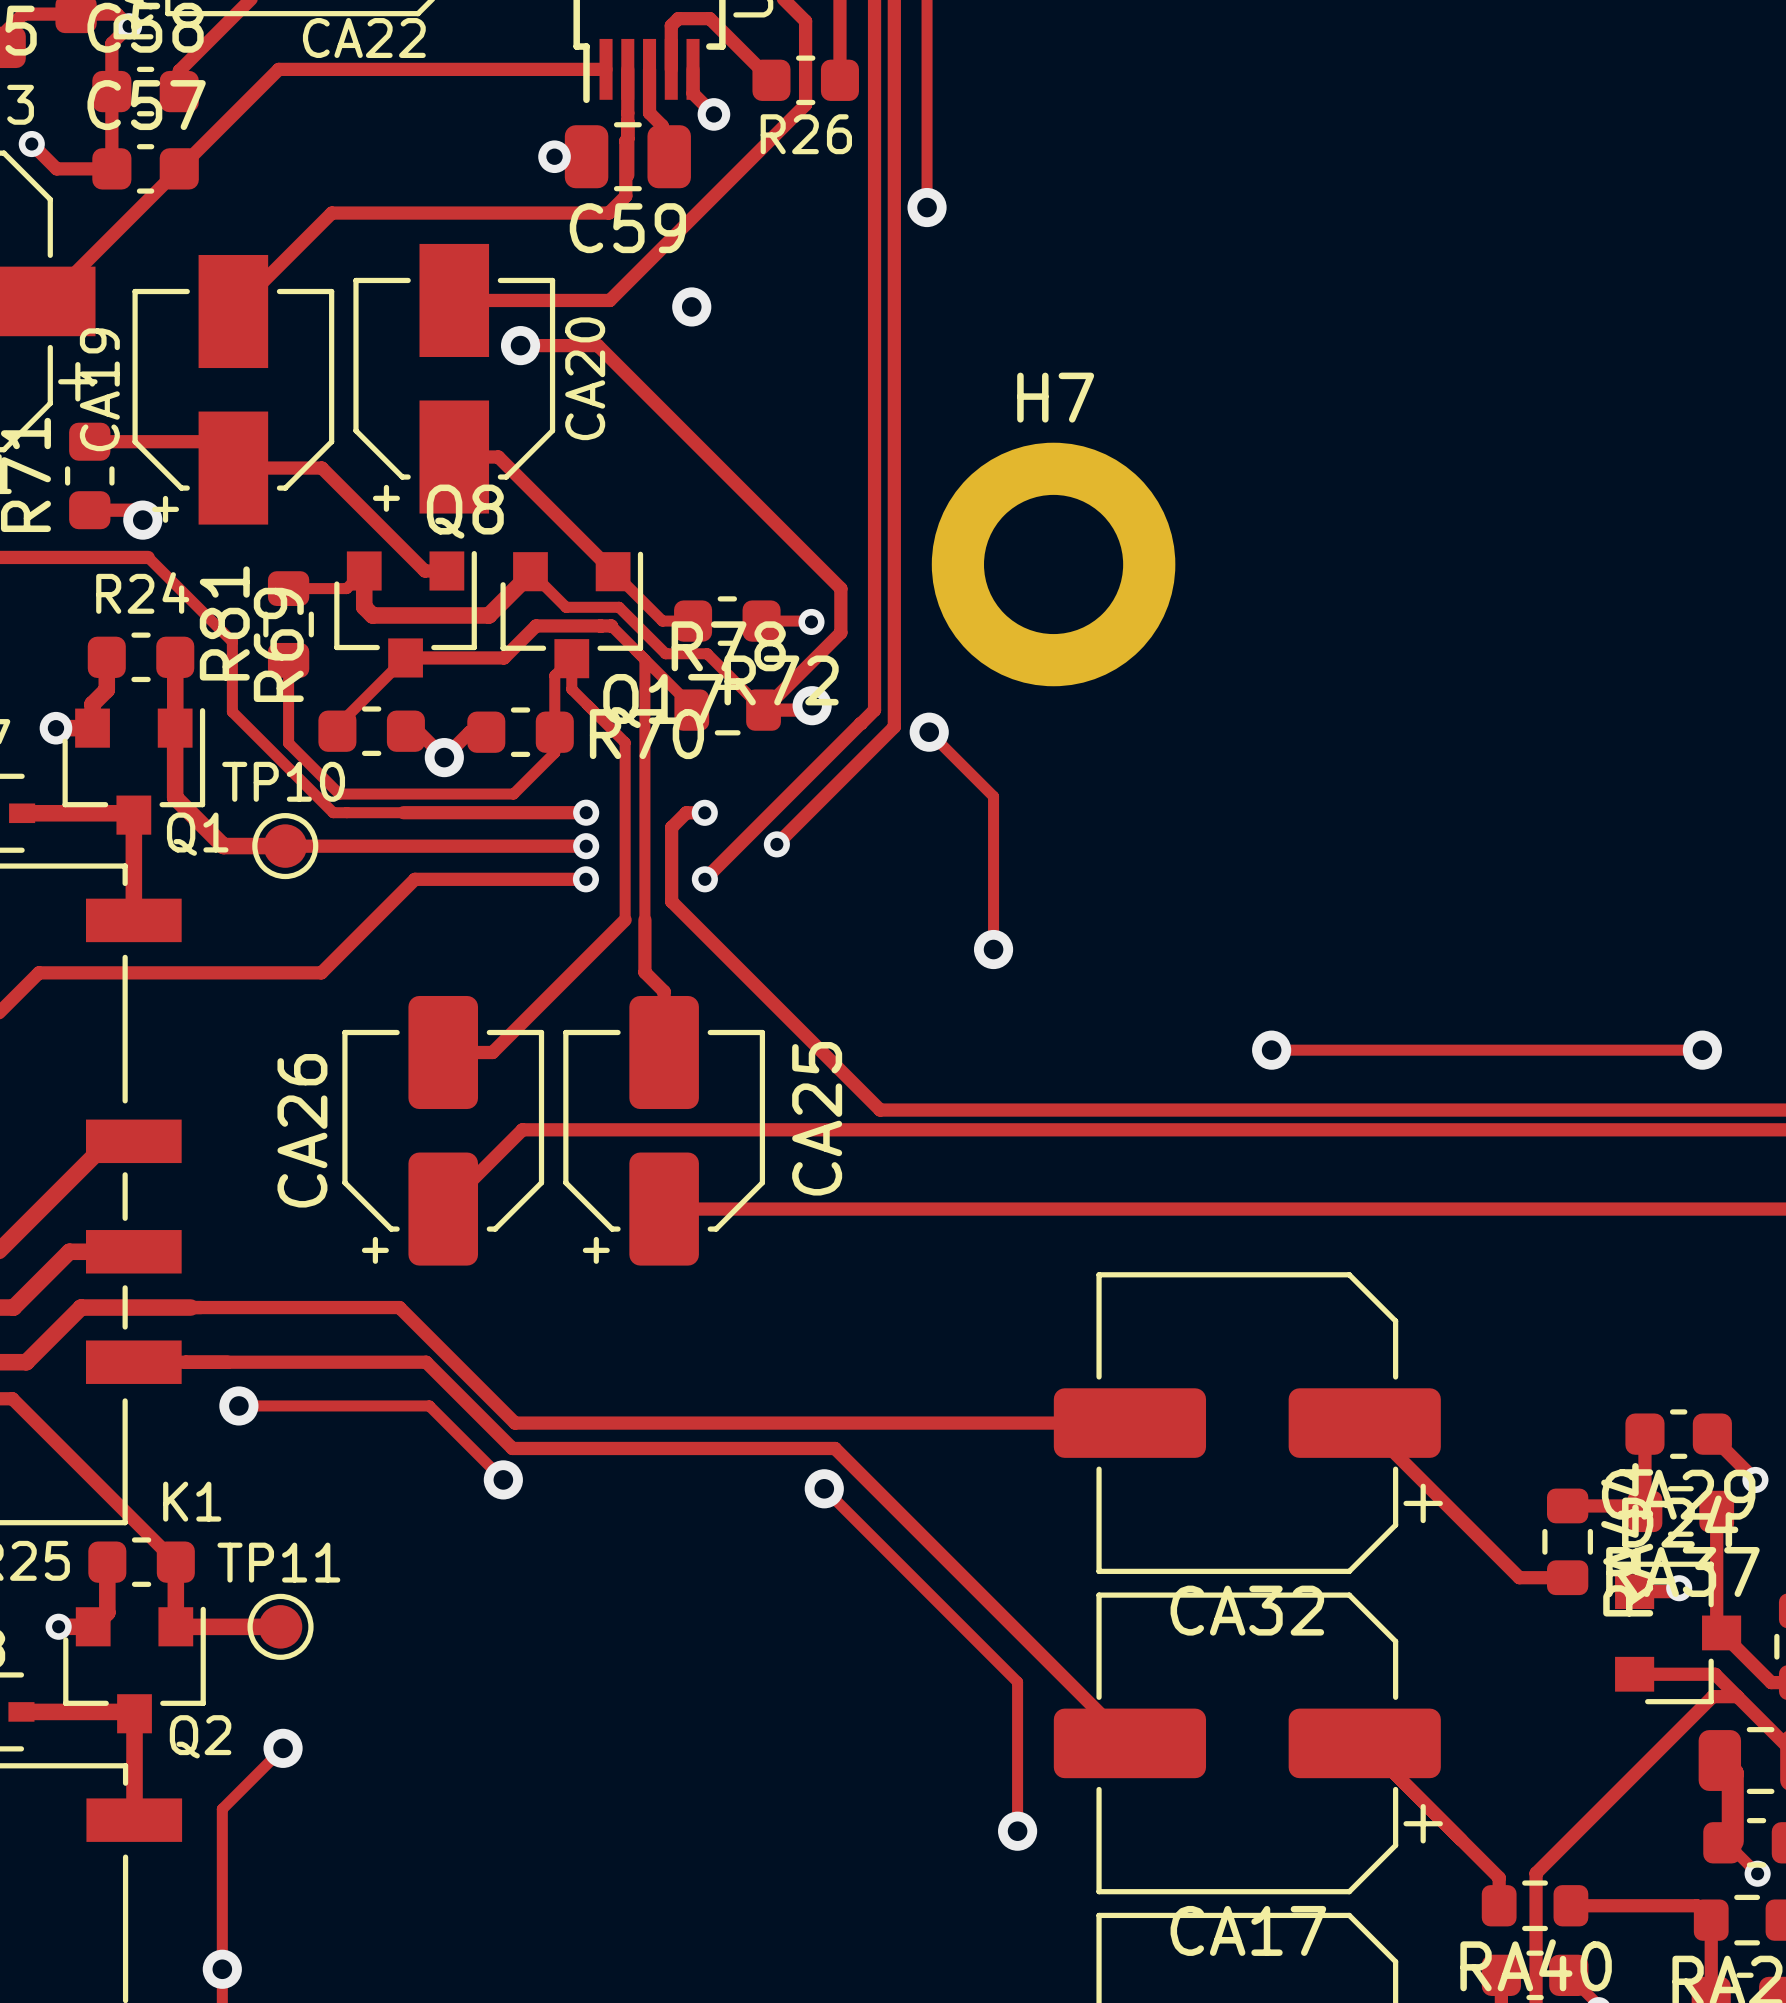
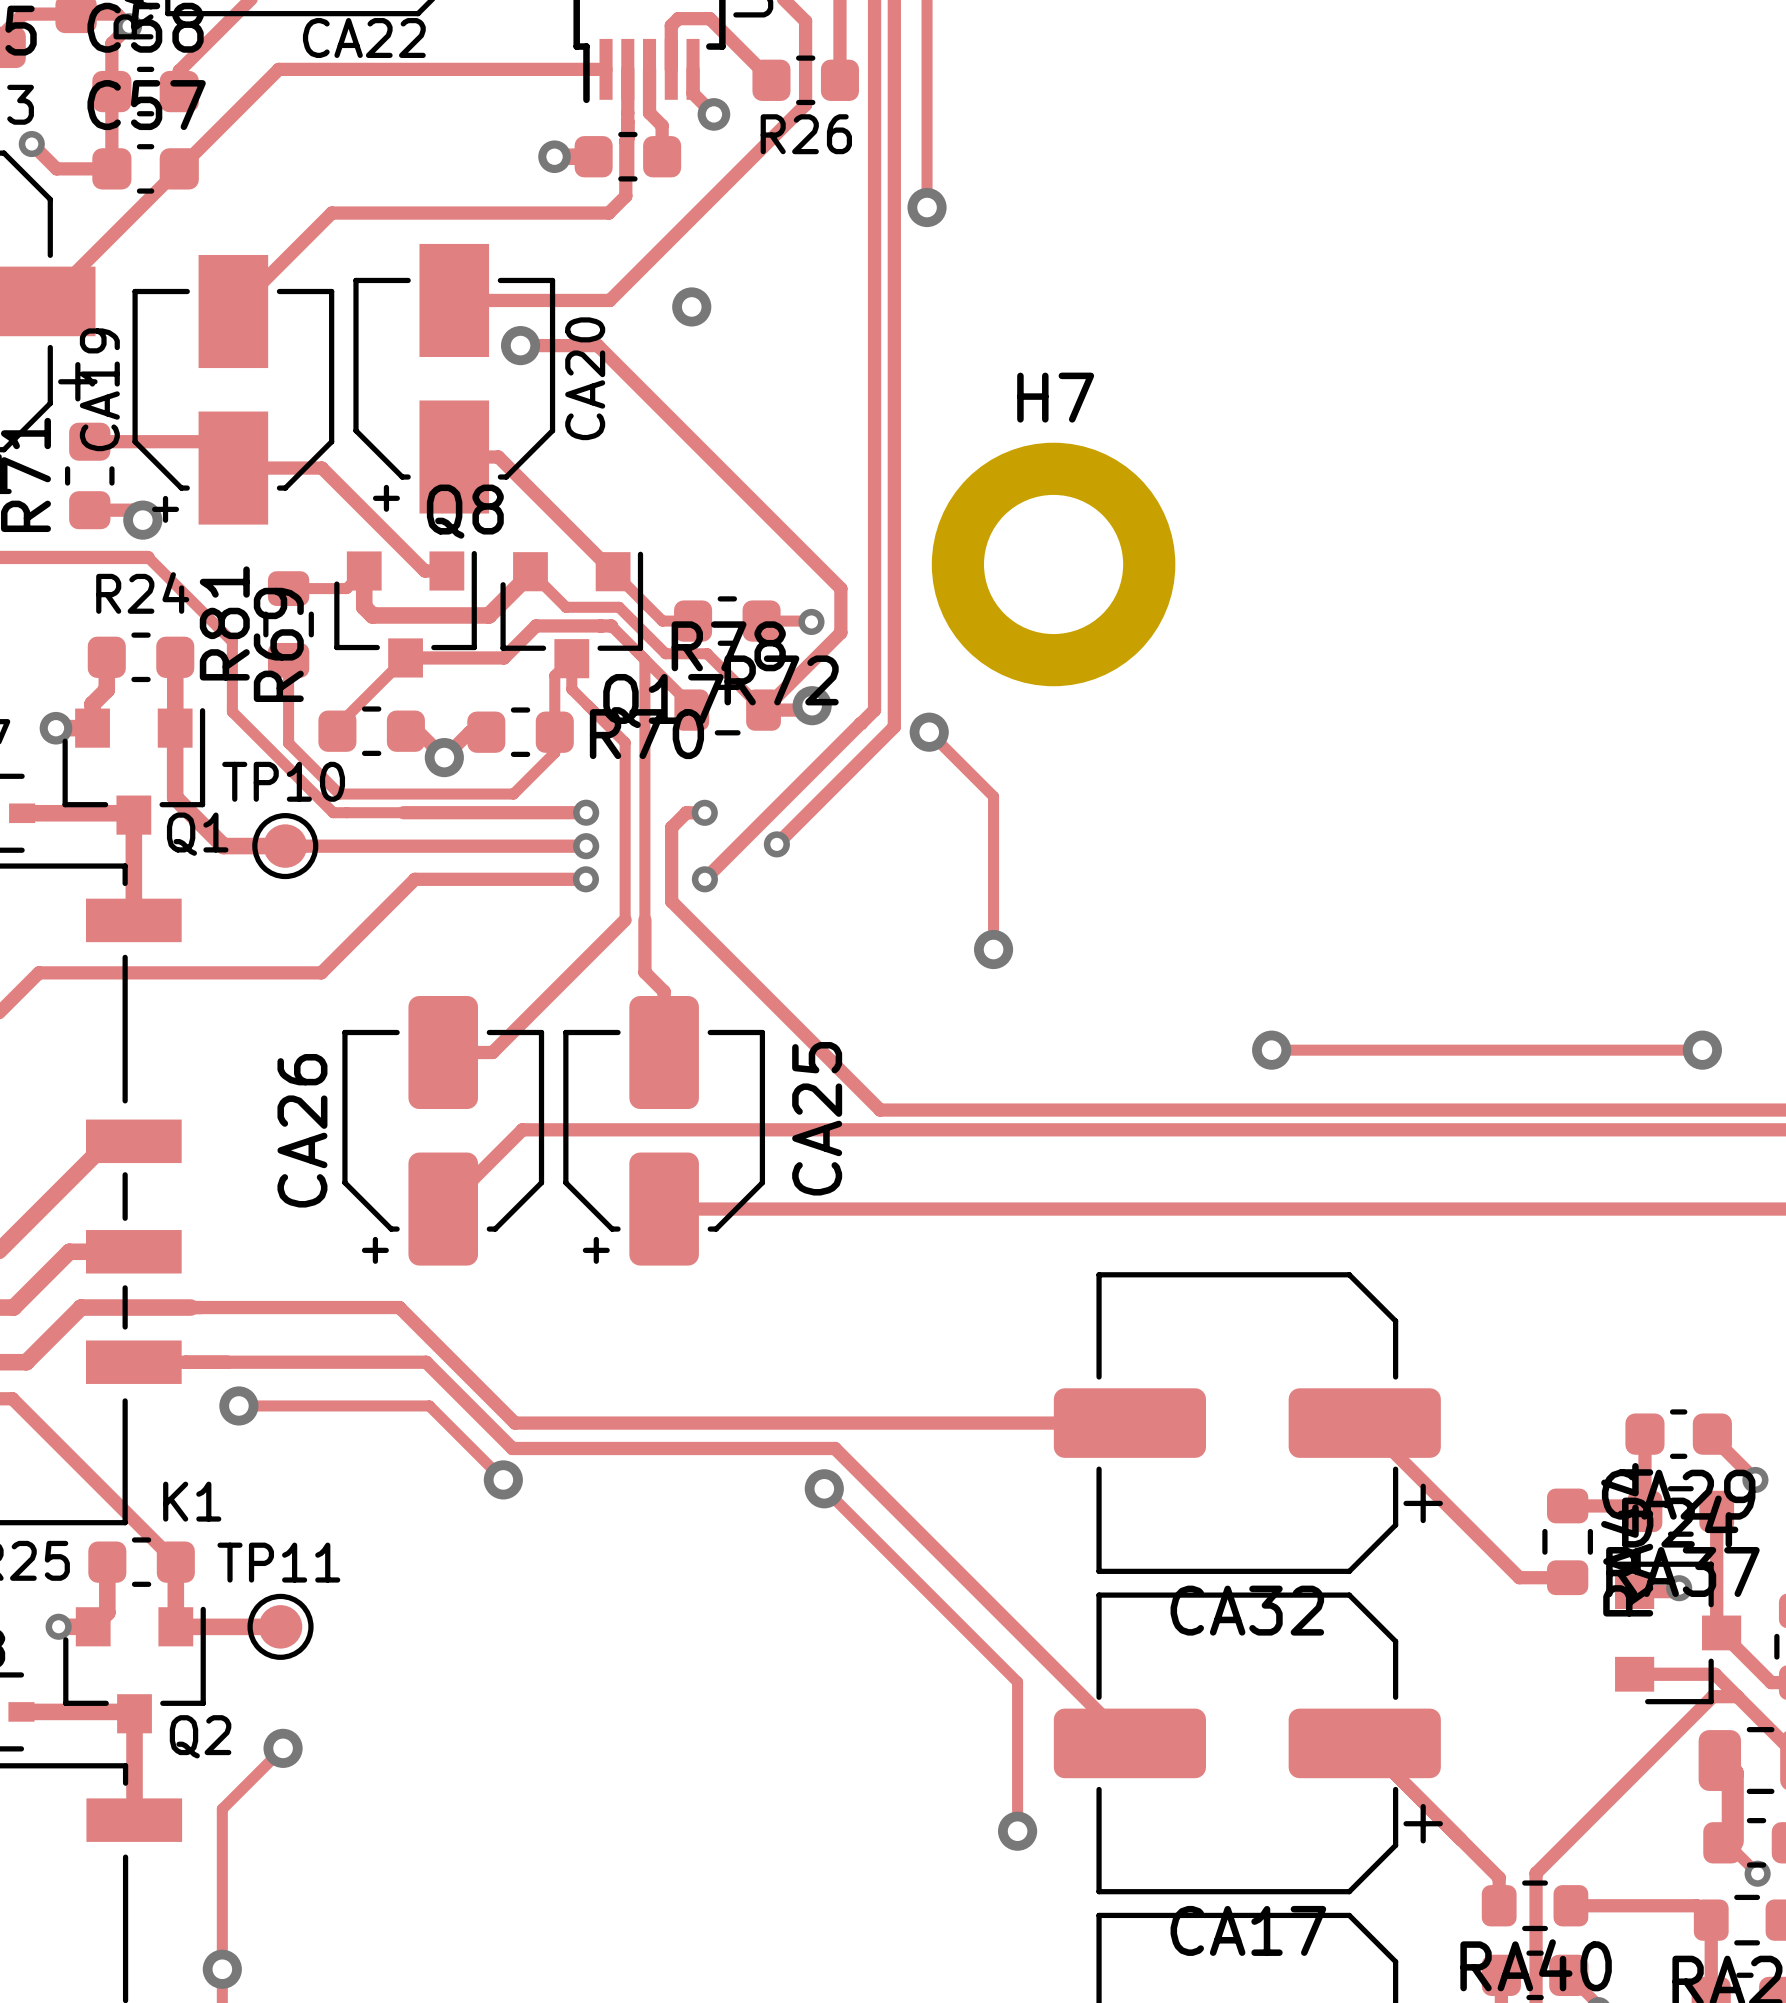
C59: (627, 156) -> none
part: none -> (627, 156)

